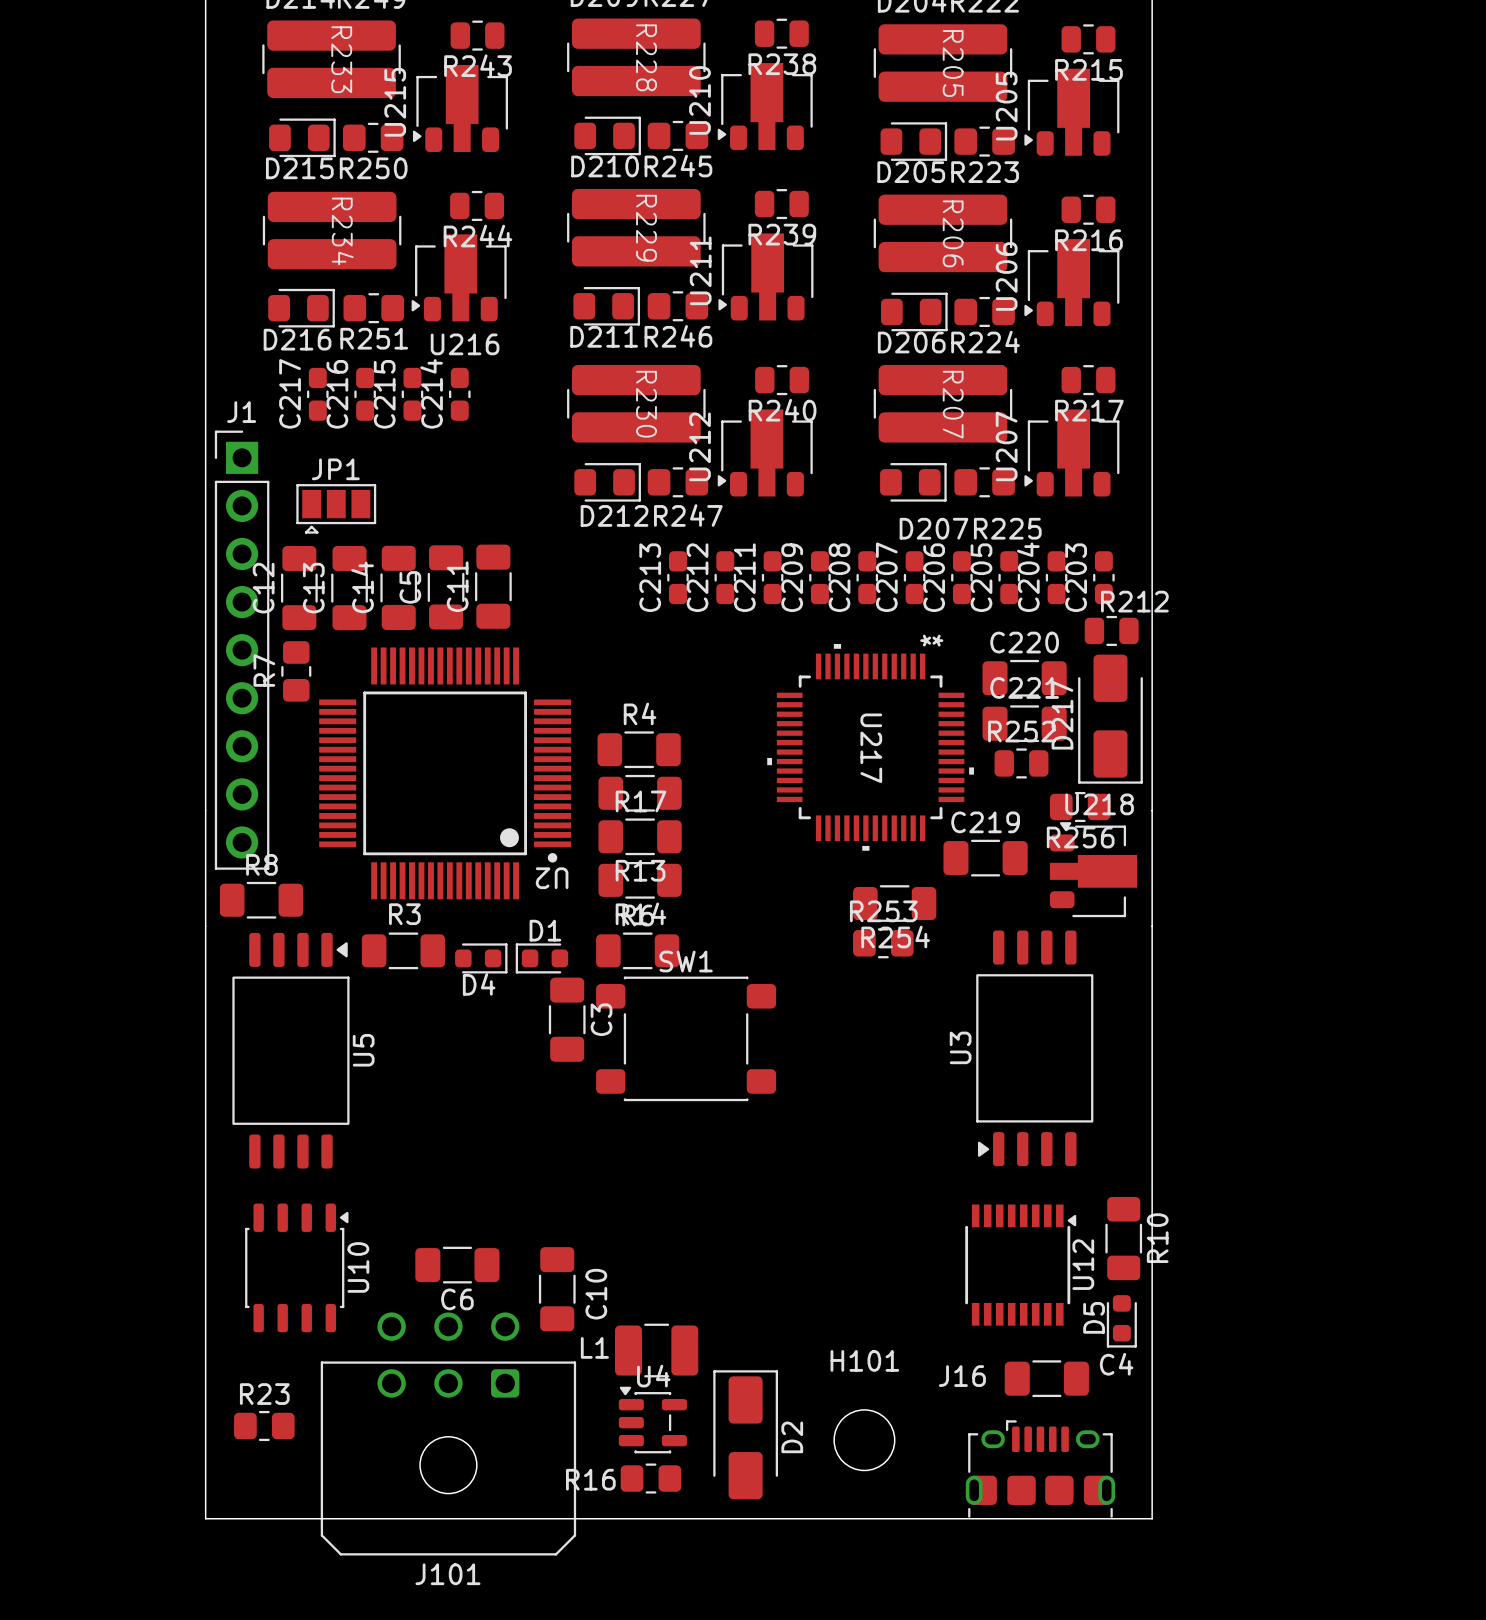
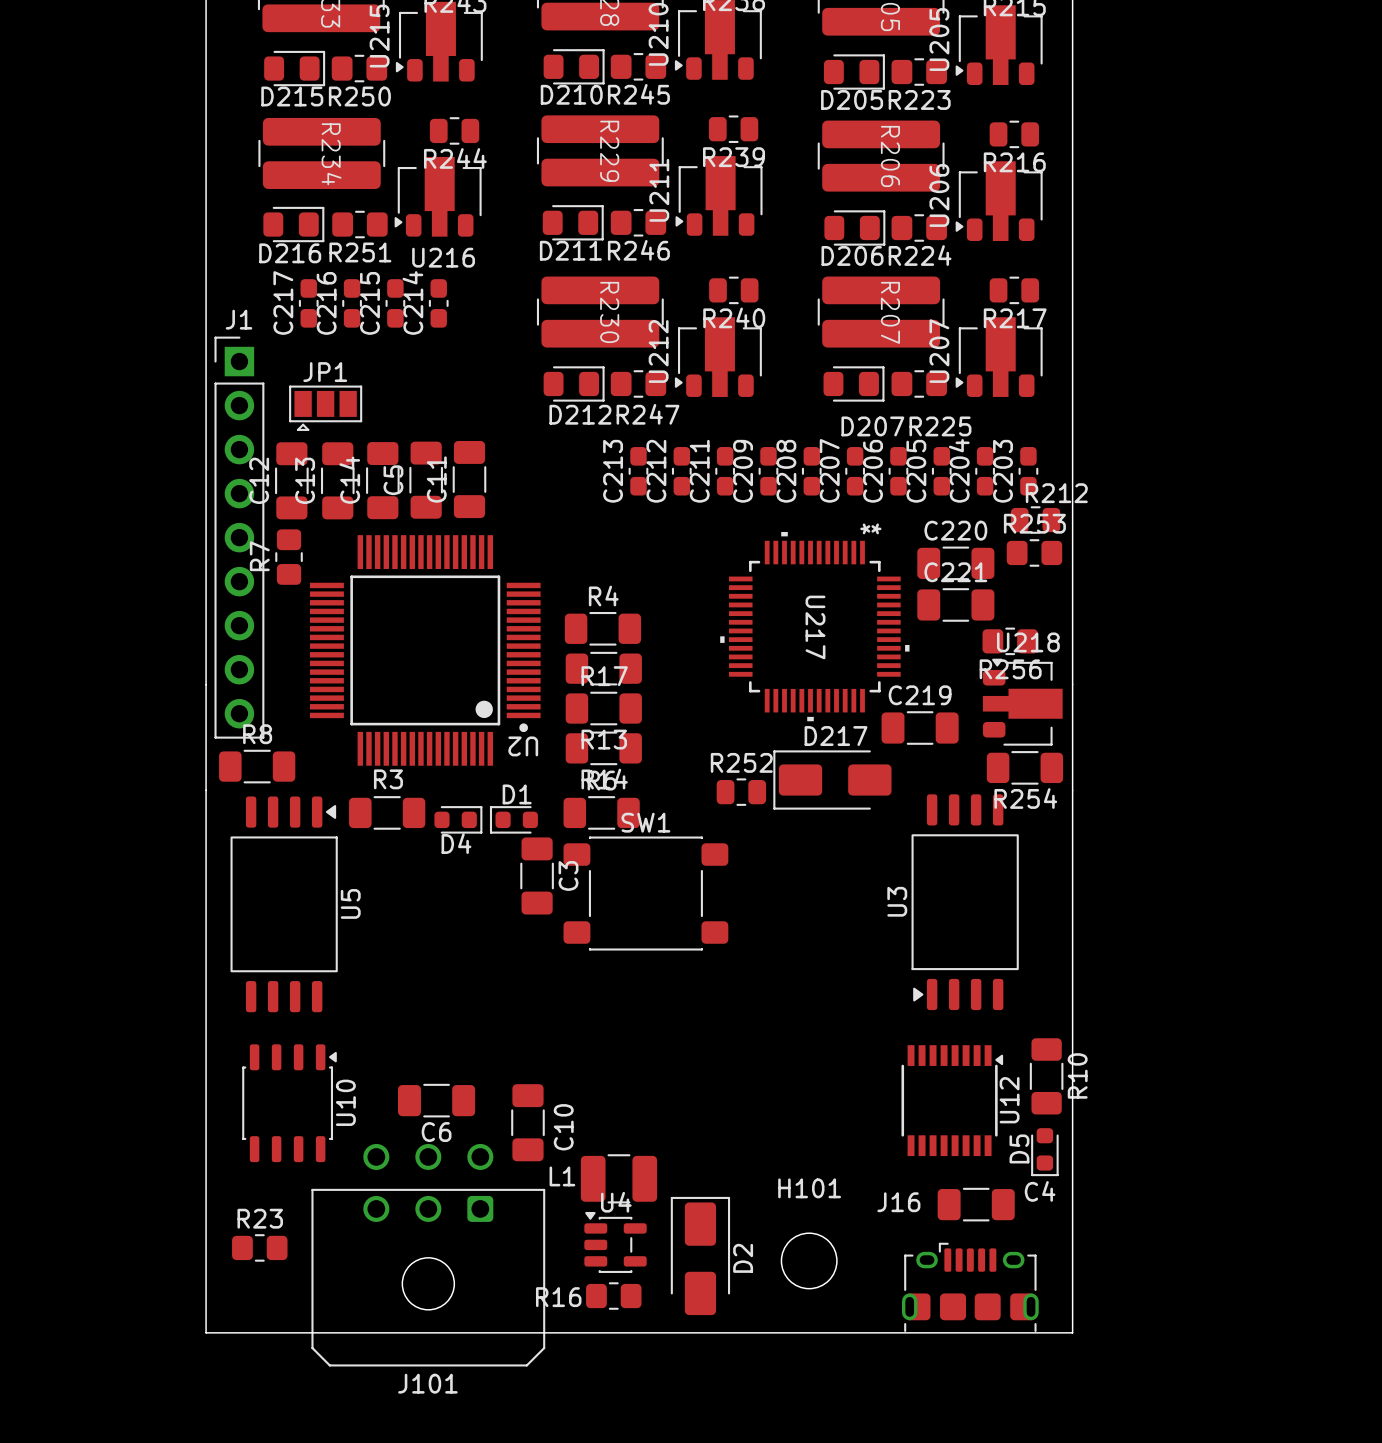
D217 rotation: 0° (1110, 719) -> 90° clockwise (832, 780)
D217 position: (1110, 719) -> (832, 780)
R252 position: (1021, 763) -> (741, 792)
R256 position: (1080, 806) -> (1010, 641)
U218 position: (1093, 869) -> (1022, 702)
R254 position: (894, 903) -> (1024, 767)
R253 position: (883, 943) -> (1034, 552)

